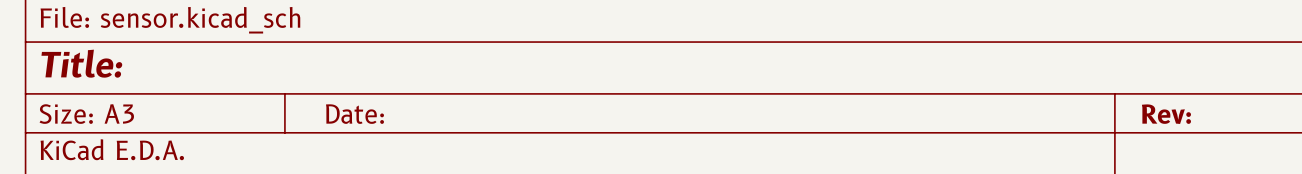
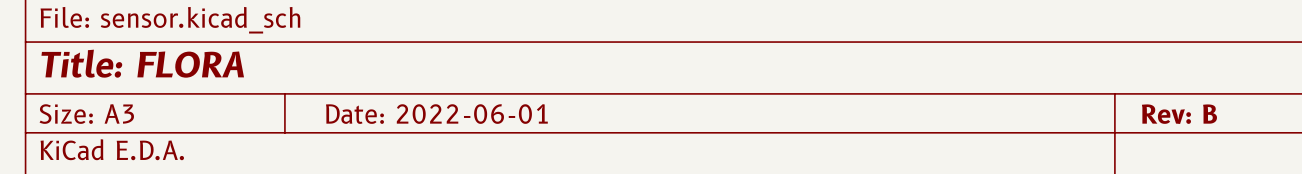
title block: Title: (81, 63) -> Title: FLORA (142, 63)
title block: Date: (354, 114) -> Date: 2022-06-01 (436, 114)
title block: Rev: (1166, 114) -> Rev: B (1179, 114)

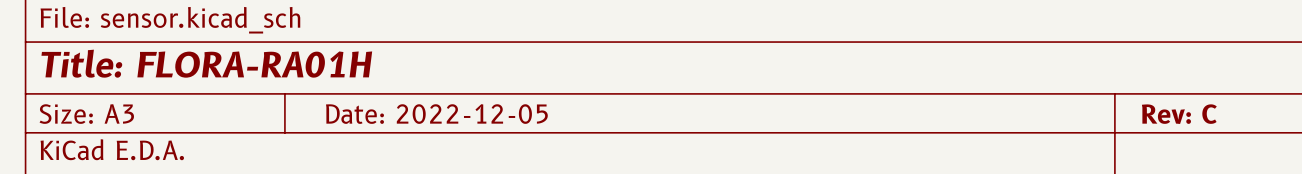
title block: Title: FLORA (142, 63) -> Title: FLORA-RA01H (206, 63)
title block: Date: 2022-06-01 (436, 114) -> Date: 2022-12-05 (436, 114)
title block: Rev: B (1179, 114) -> Rev: C (1179, 114)

